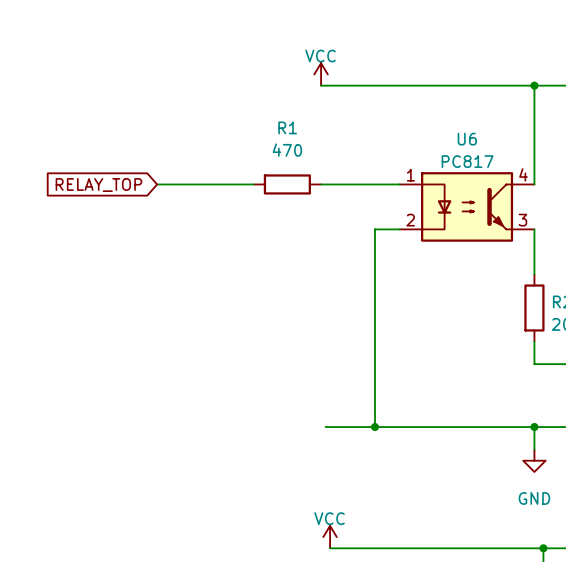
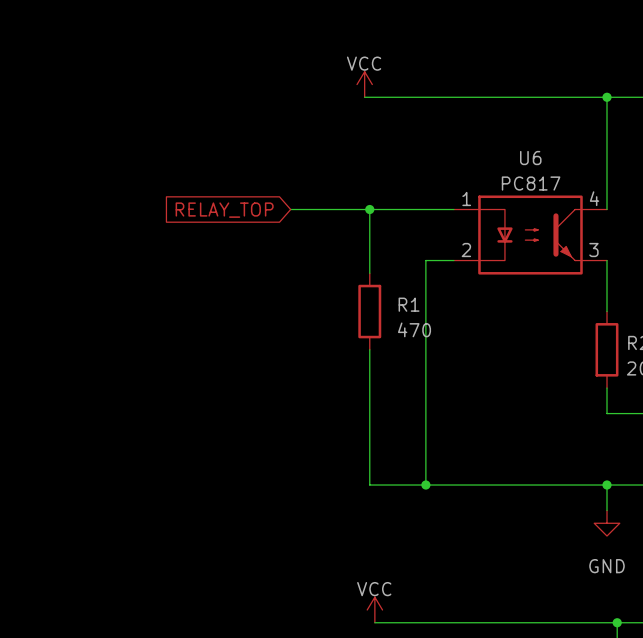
R1 name position: R1 (287, 127) -> R1 (409, 304)
R1 value position: 470 (287, 150) -> 470 (414, 329)
wire: (157, 184) (253, 184) -> none
wire: none -> (290, 209) (364, 209)
R1 rotation: 0° (287, 184) -> 90° clockwise (369, 311)
R1 position: (287, 184) -> (369, 311)
wire: none -> (369, 209) (369, 273)
junction: none -> (369, 209)
global label position: RELAY_TOP (98, 185) -> RELAY_TOP (224, 210)
wire: none -> (369, 349) (369, 485)

